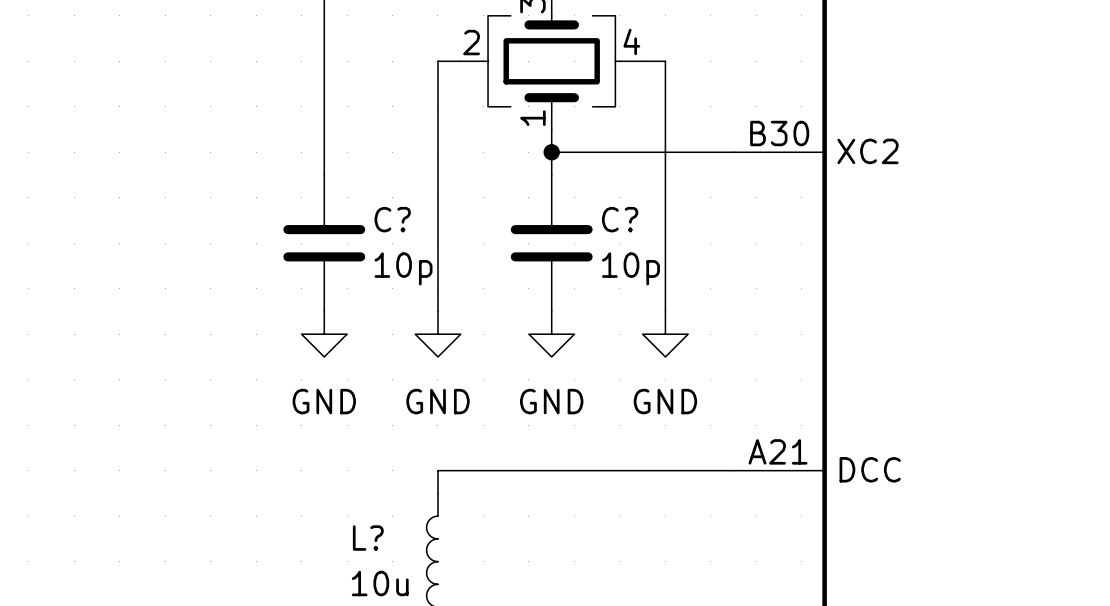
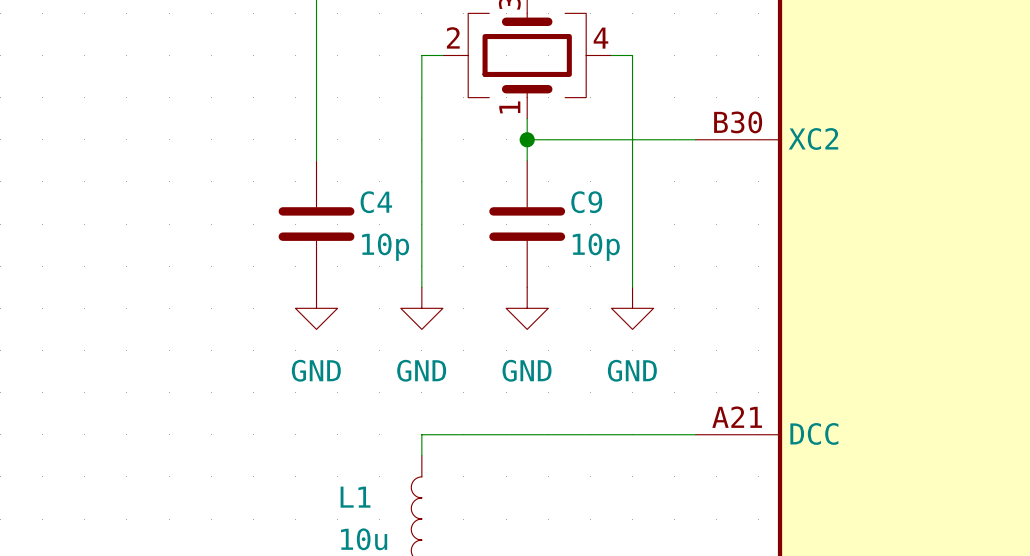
C? name: C? (392, 219) -> C4 (376, 202)
C? name: C? (620, 219) -> C9 (586, 202)
L? name: L? (368, 538) -> L1 (355, 497)

